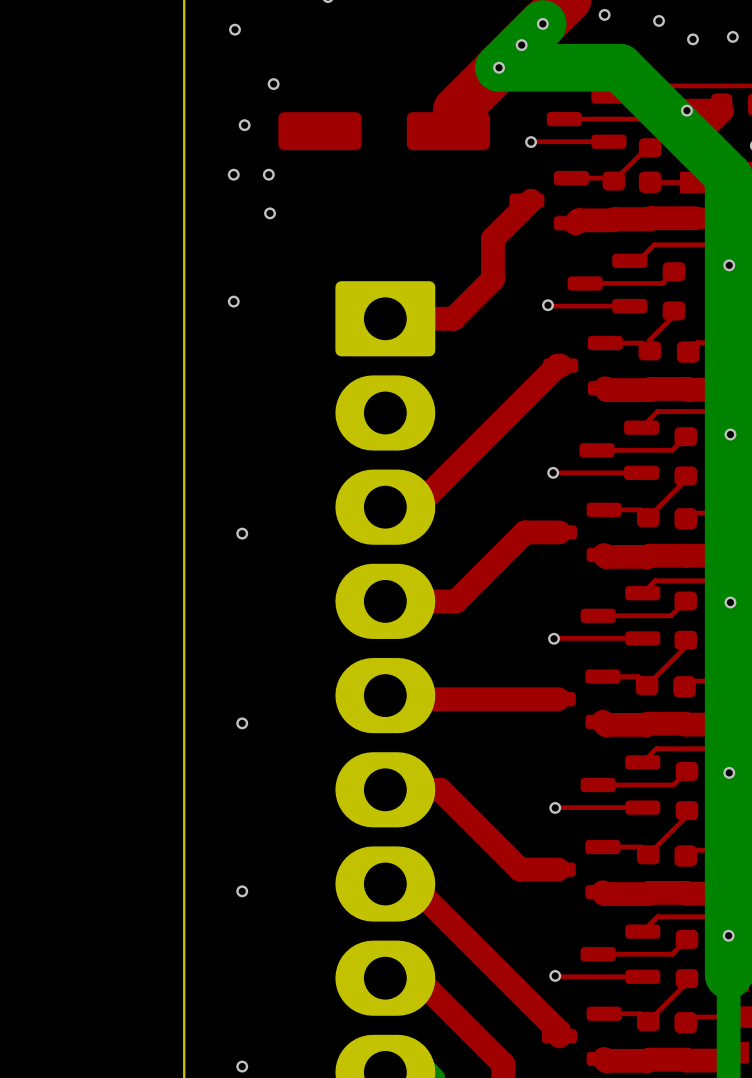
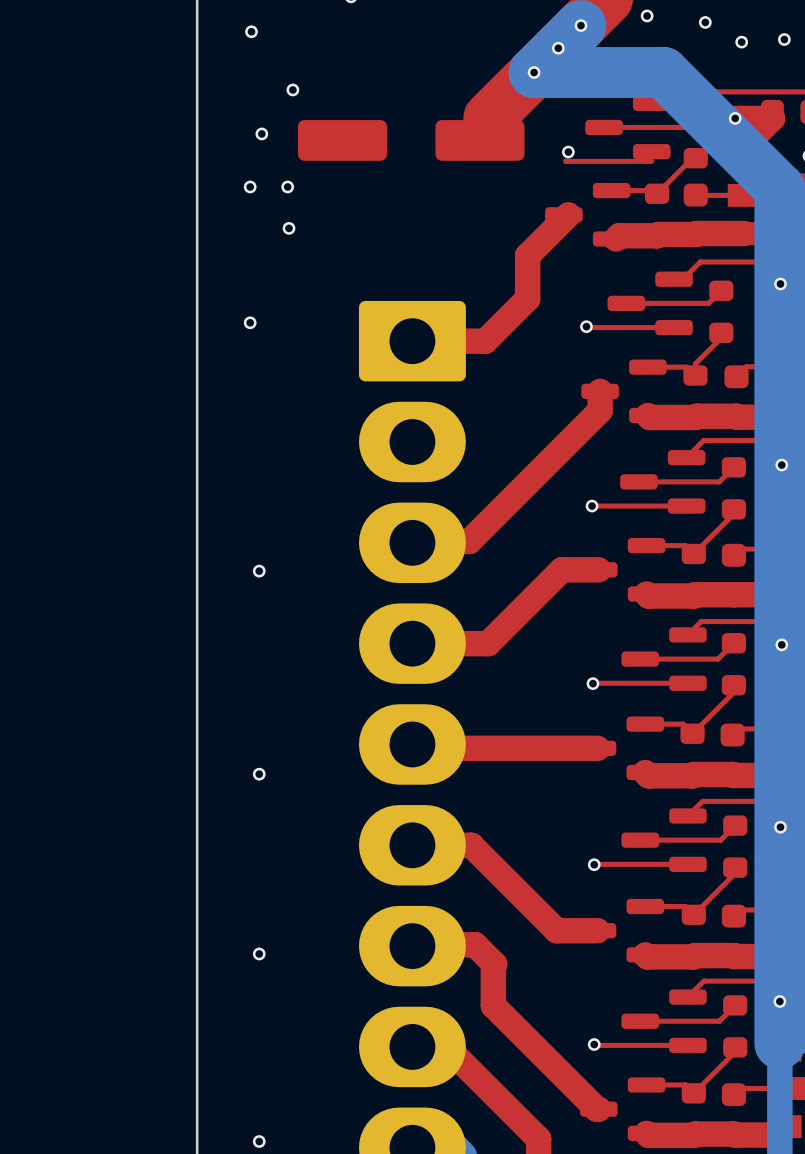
top track: (608, 141) (531, 142) -> none
top track: none -> (651, 161) (566, 161)
top track: (560, 365) (557, 365) (416, 507) (385, 507) -> (600, 391) (600, 410) (469, 541) (412, 541)
top track: (385, 884) (411, 884) (559, 1032) (559, 1036) -> (412, 944) (475, 944) (494, 964) (493, 1005) (598, 1109)

